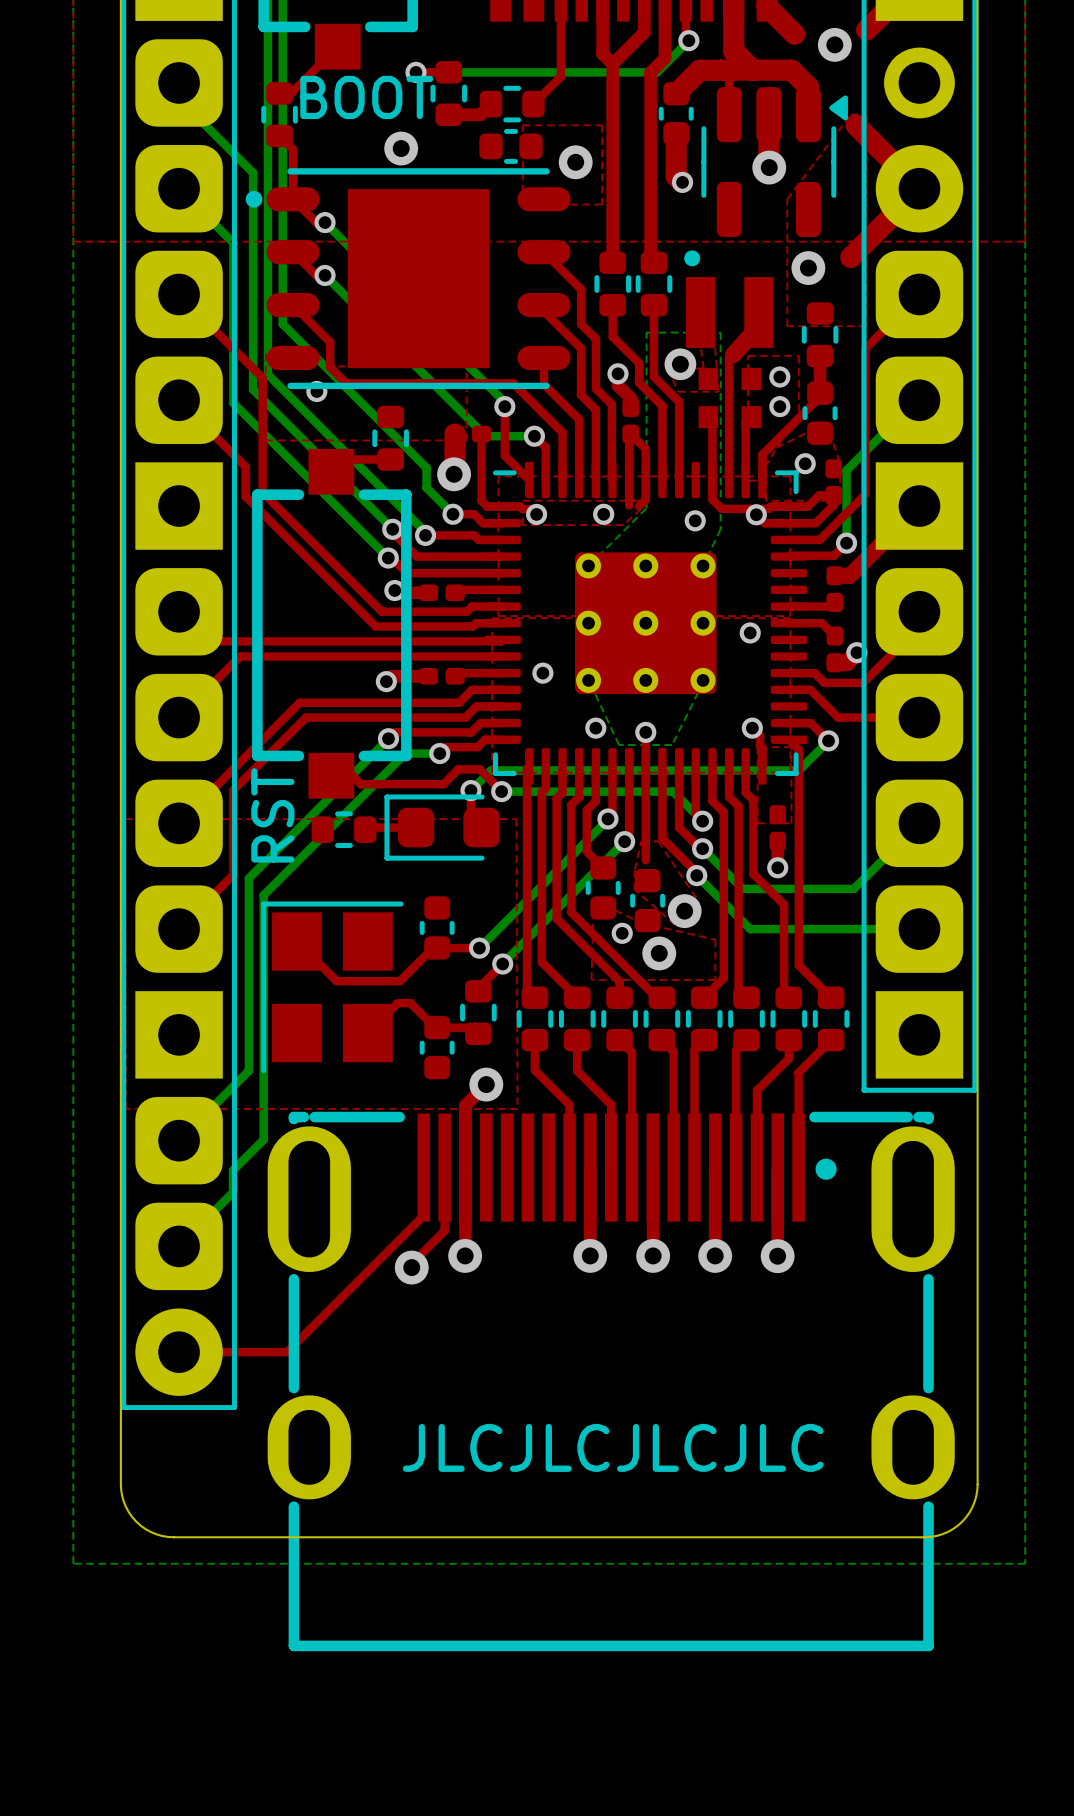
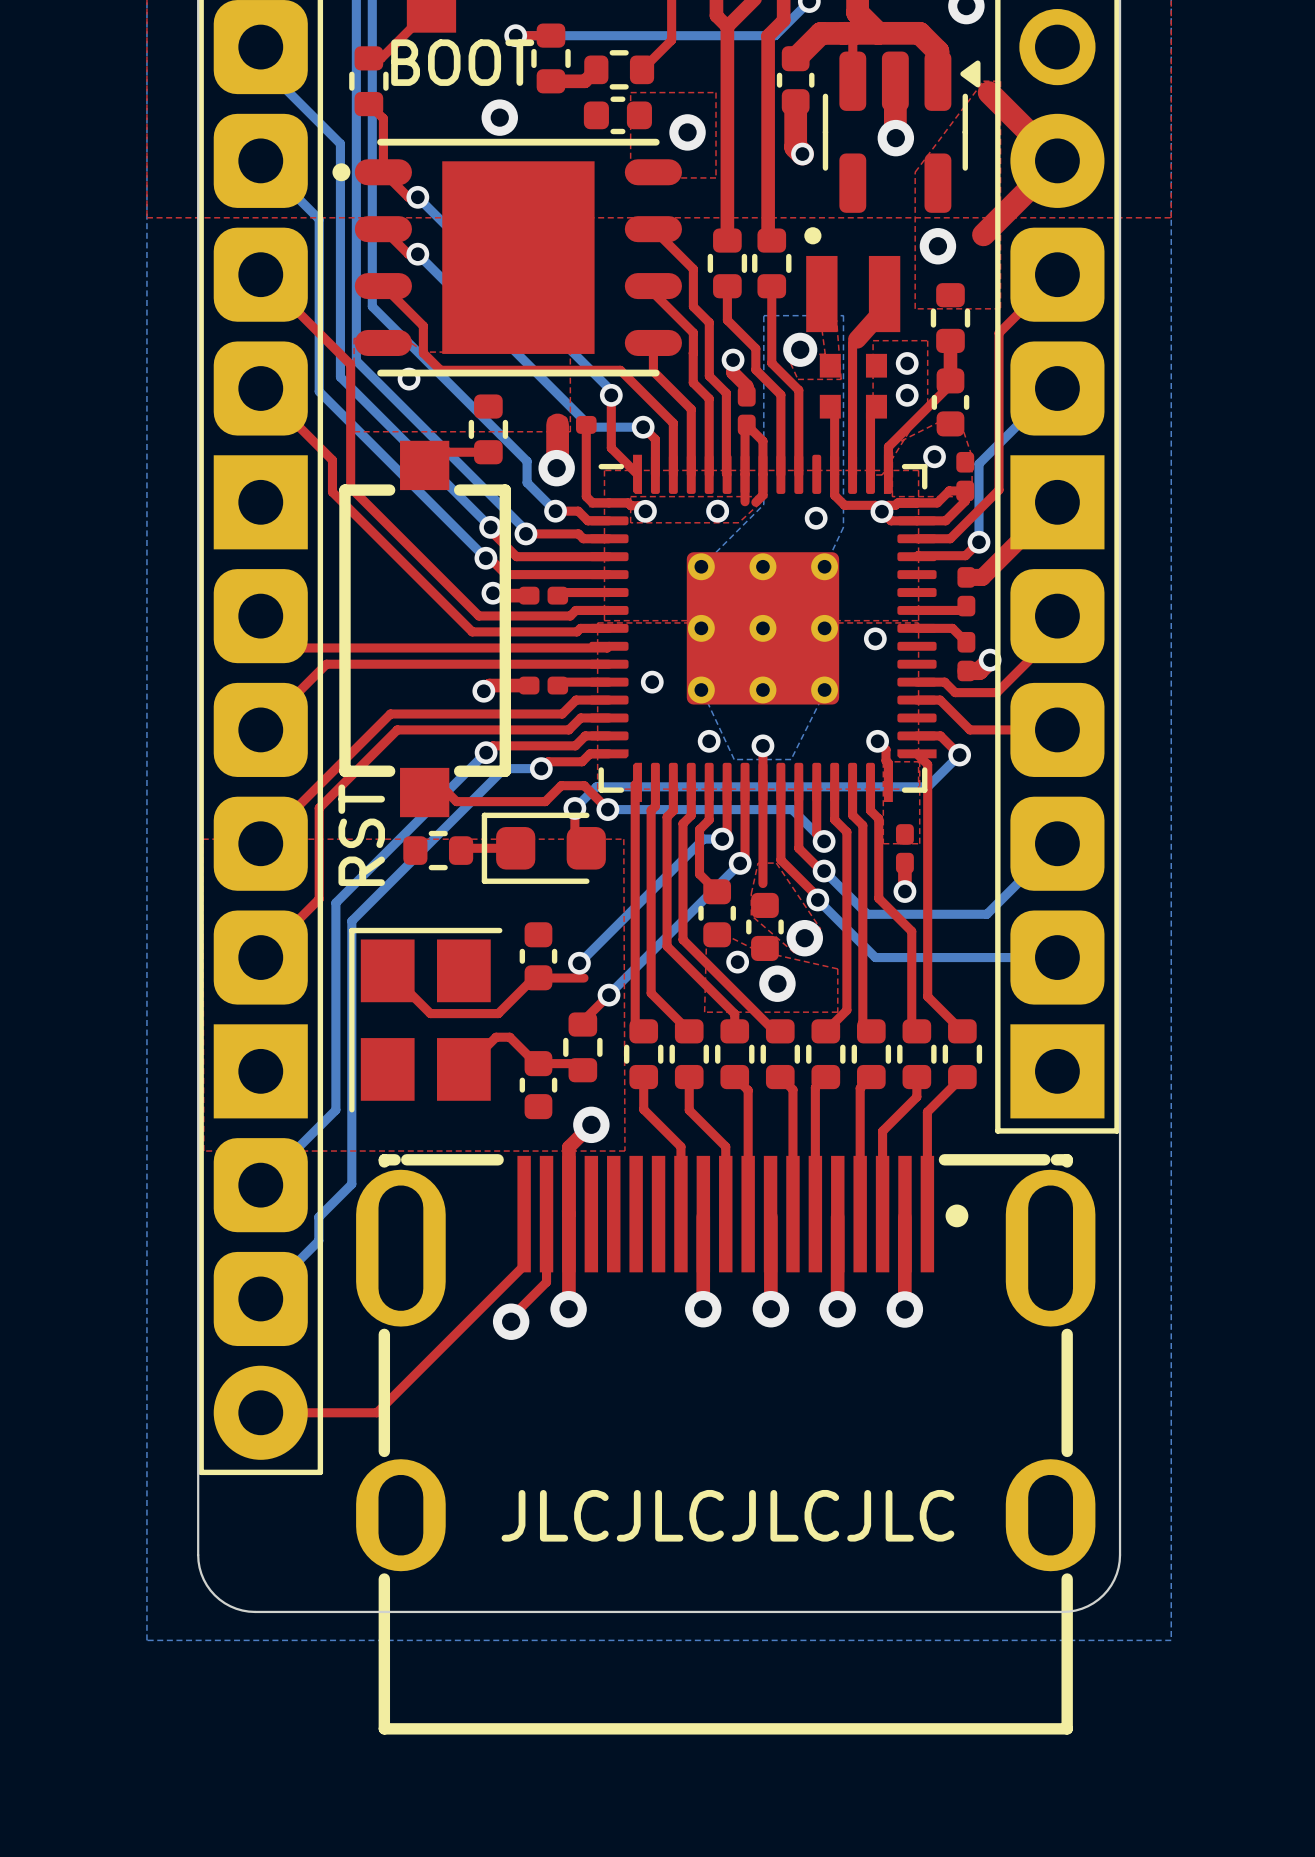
bottom track: (607, 819) (479, 948) -> (722, 839) (703, 839) (579, 963)
via position: (479, 948) -> (579, 963)

